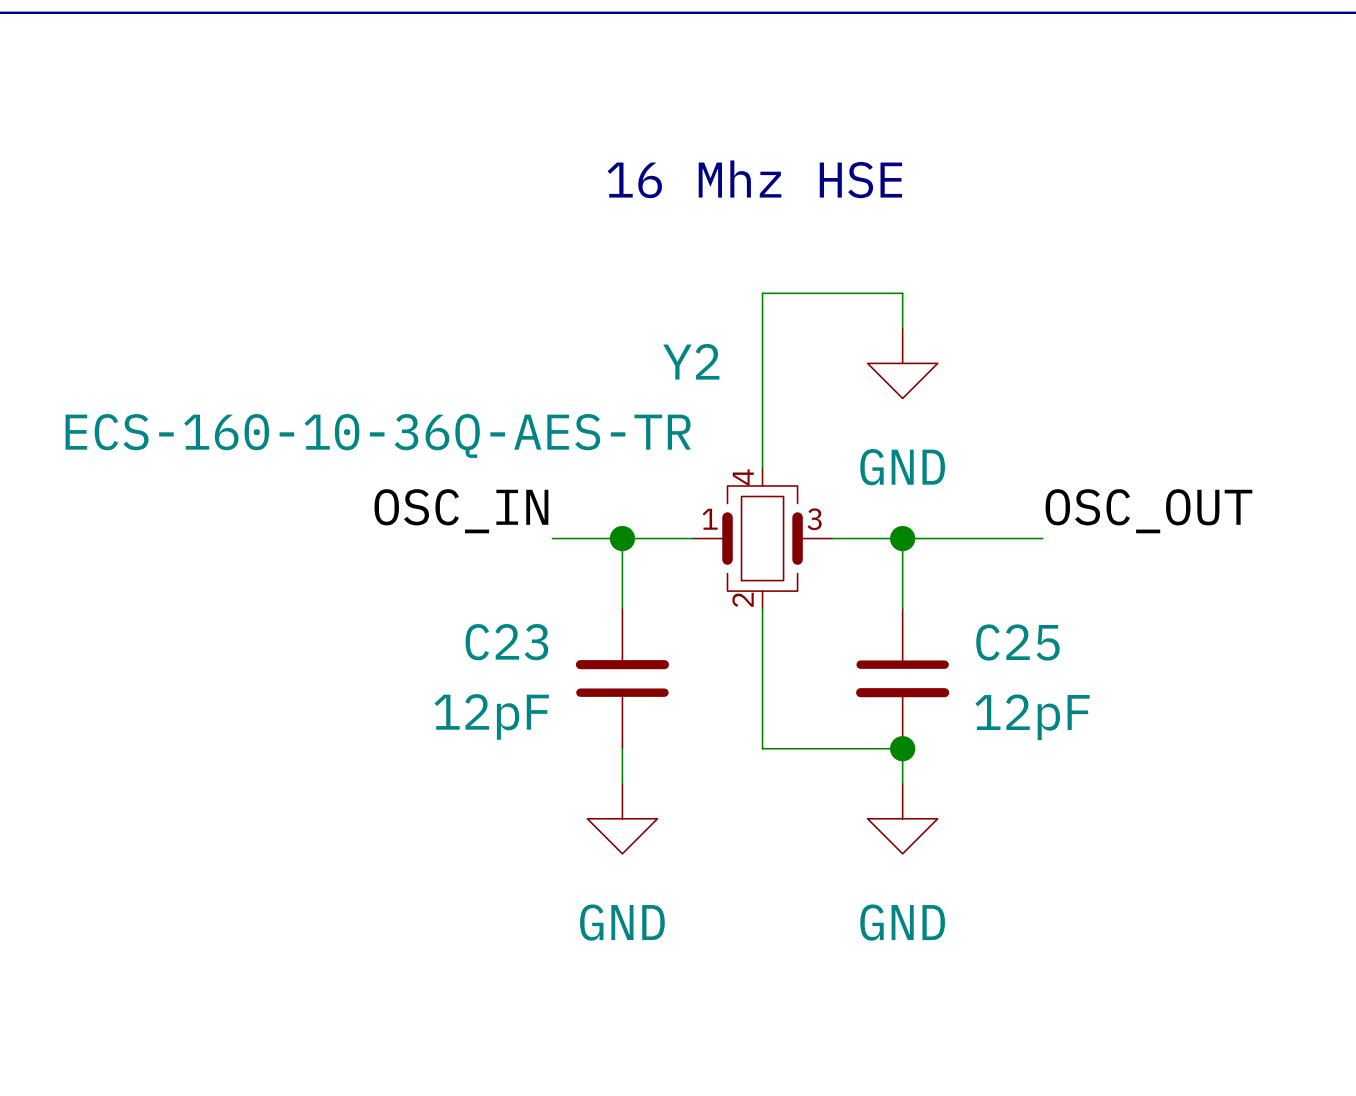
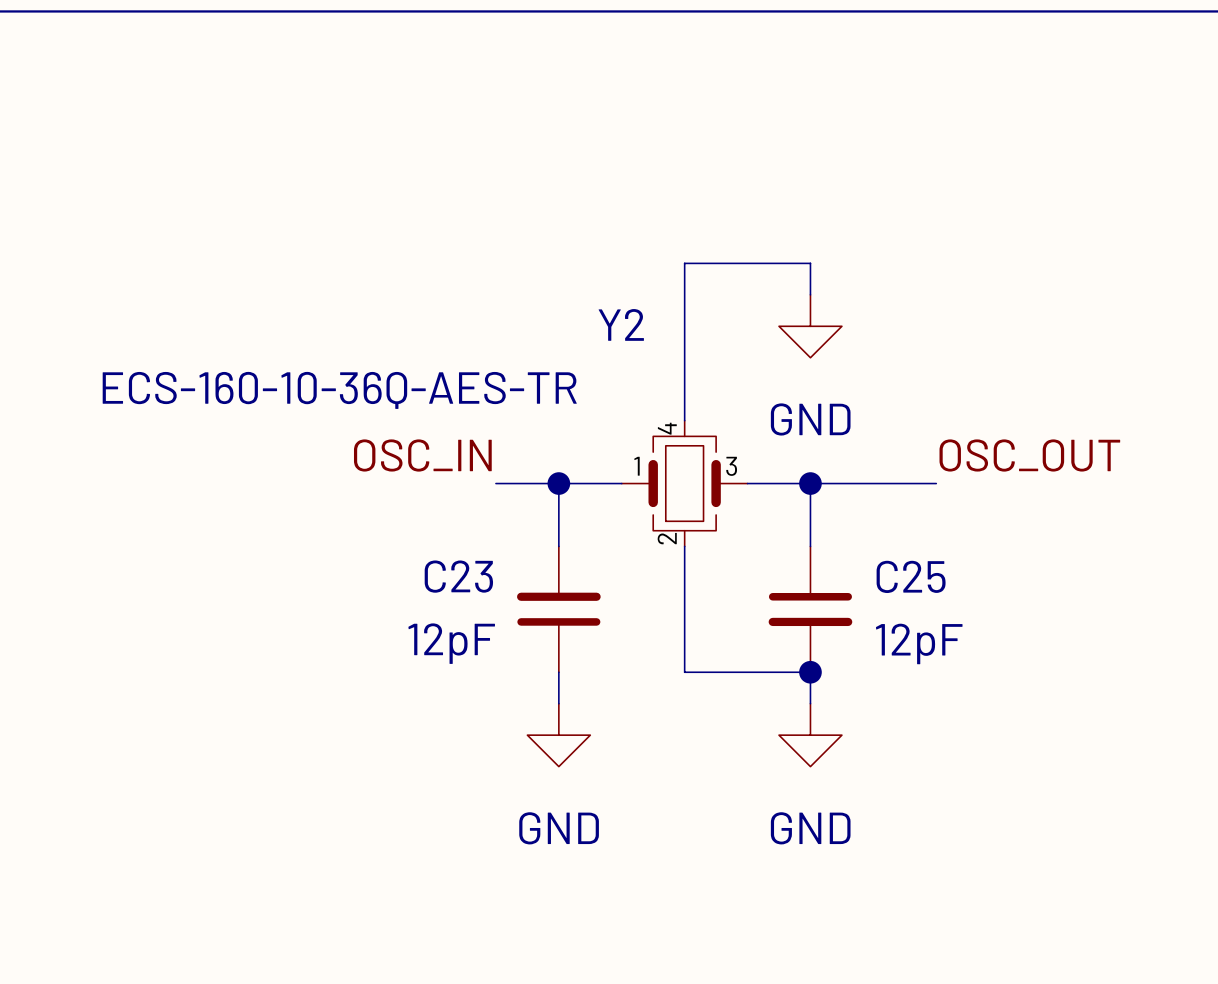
text: 16 Mhz HSE (754, 179) -> none

